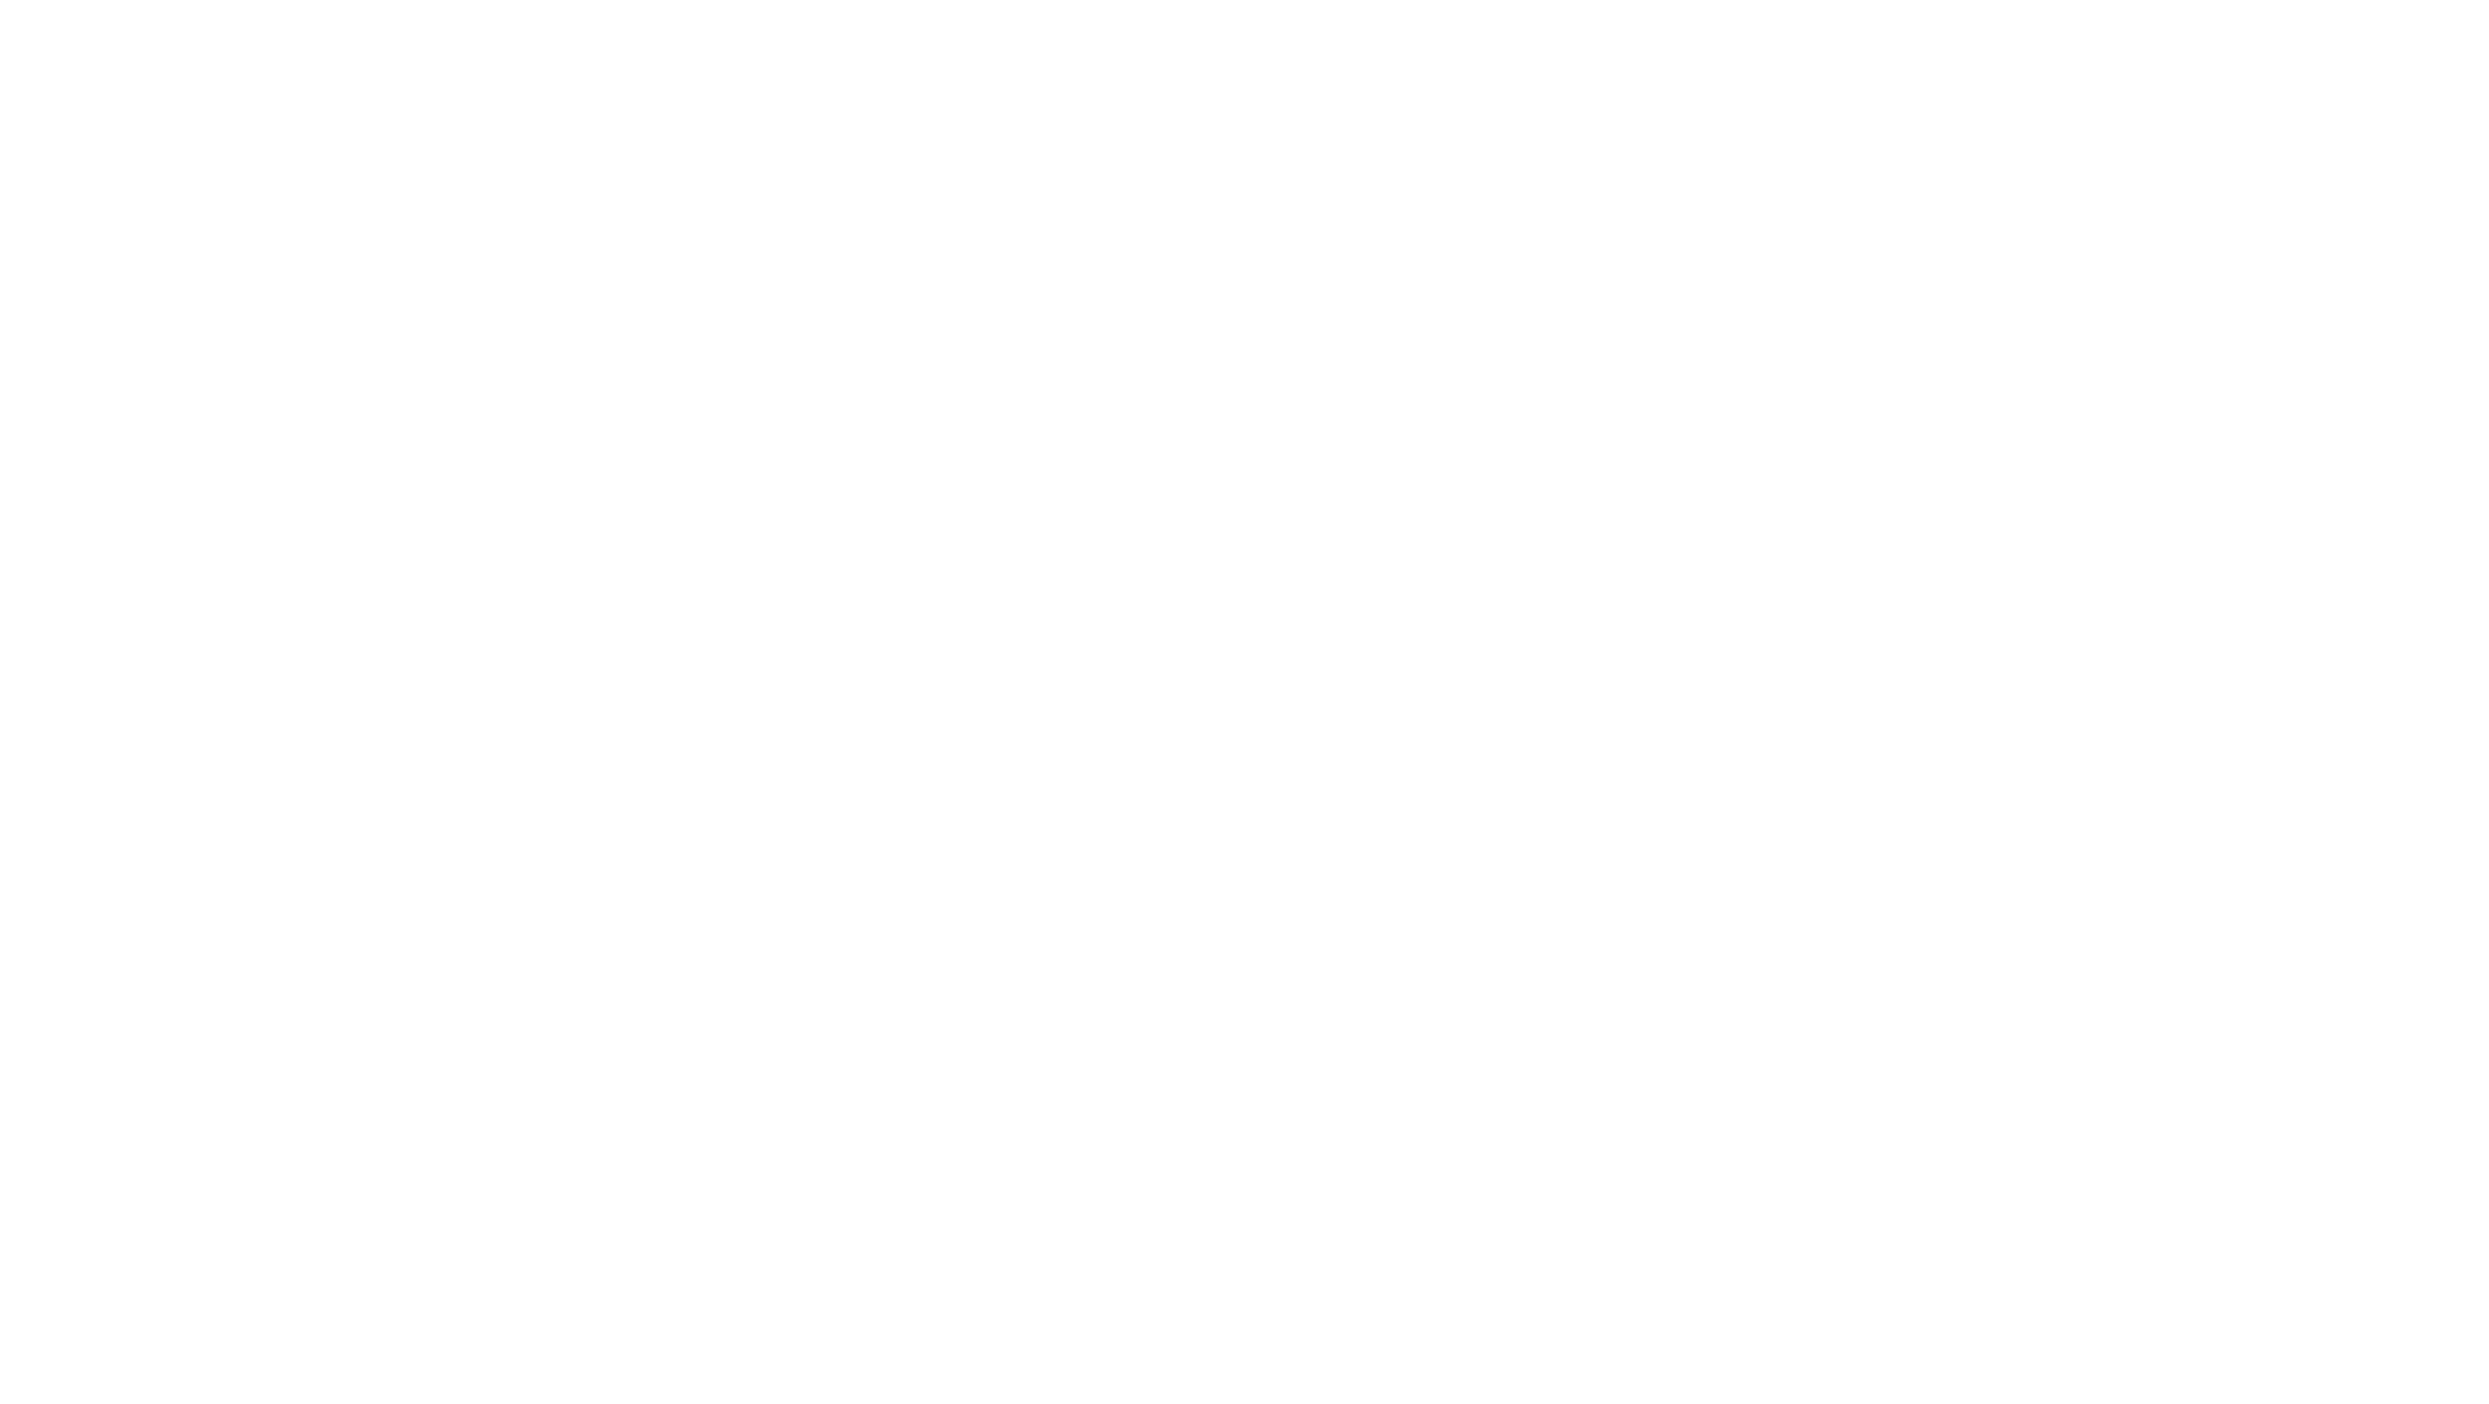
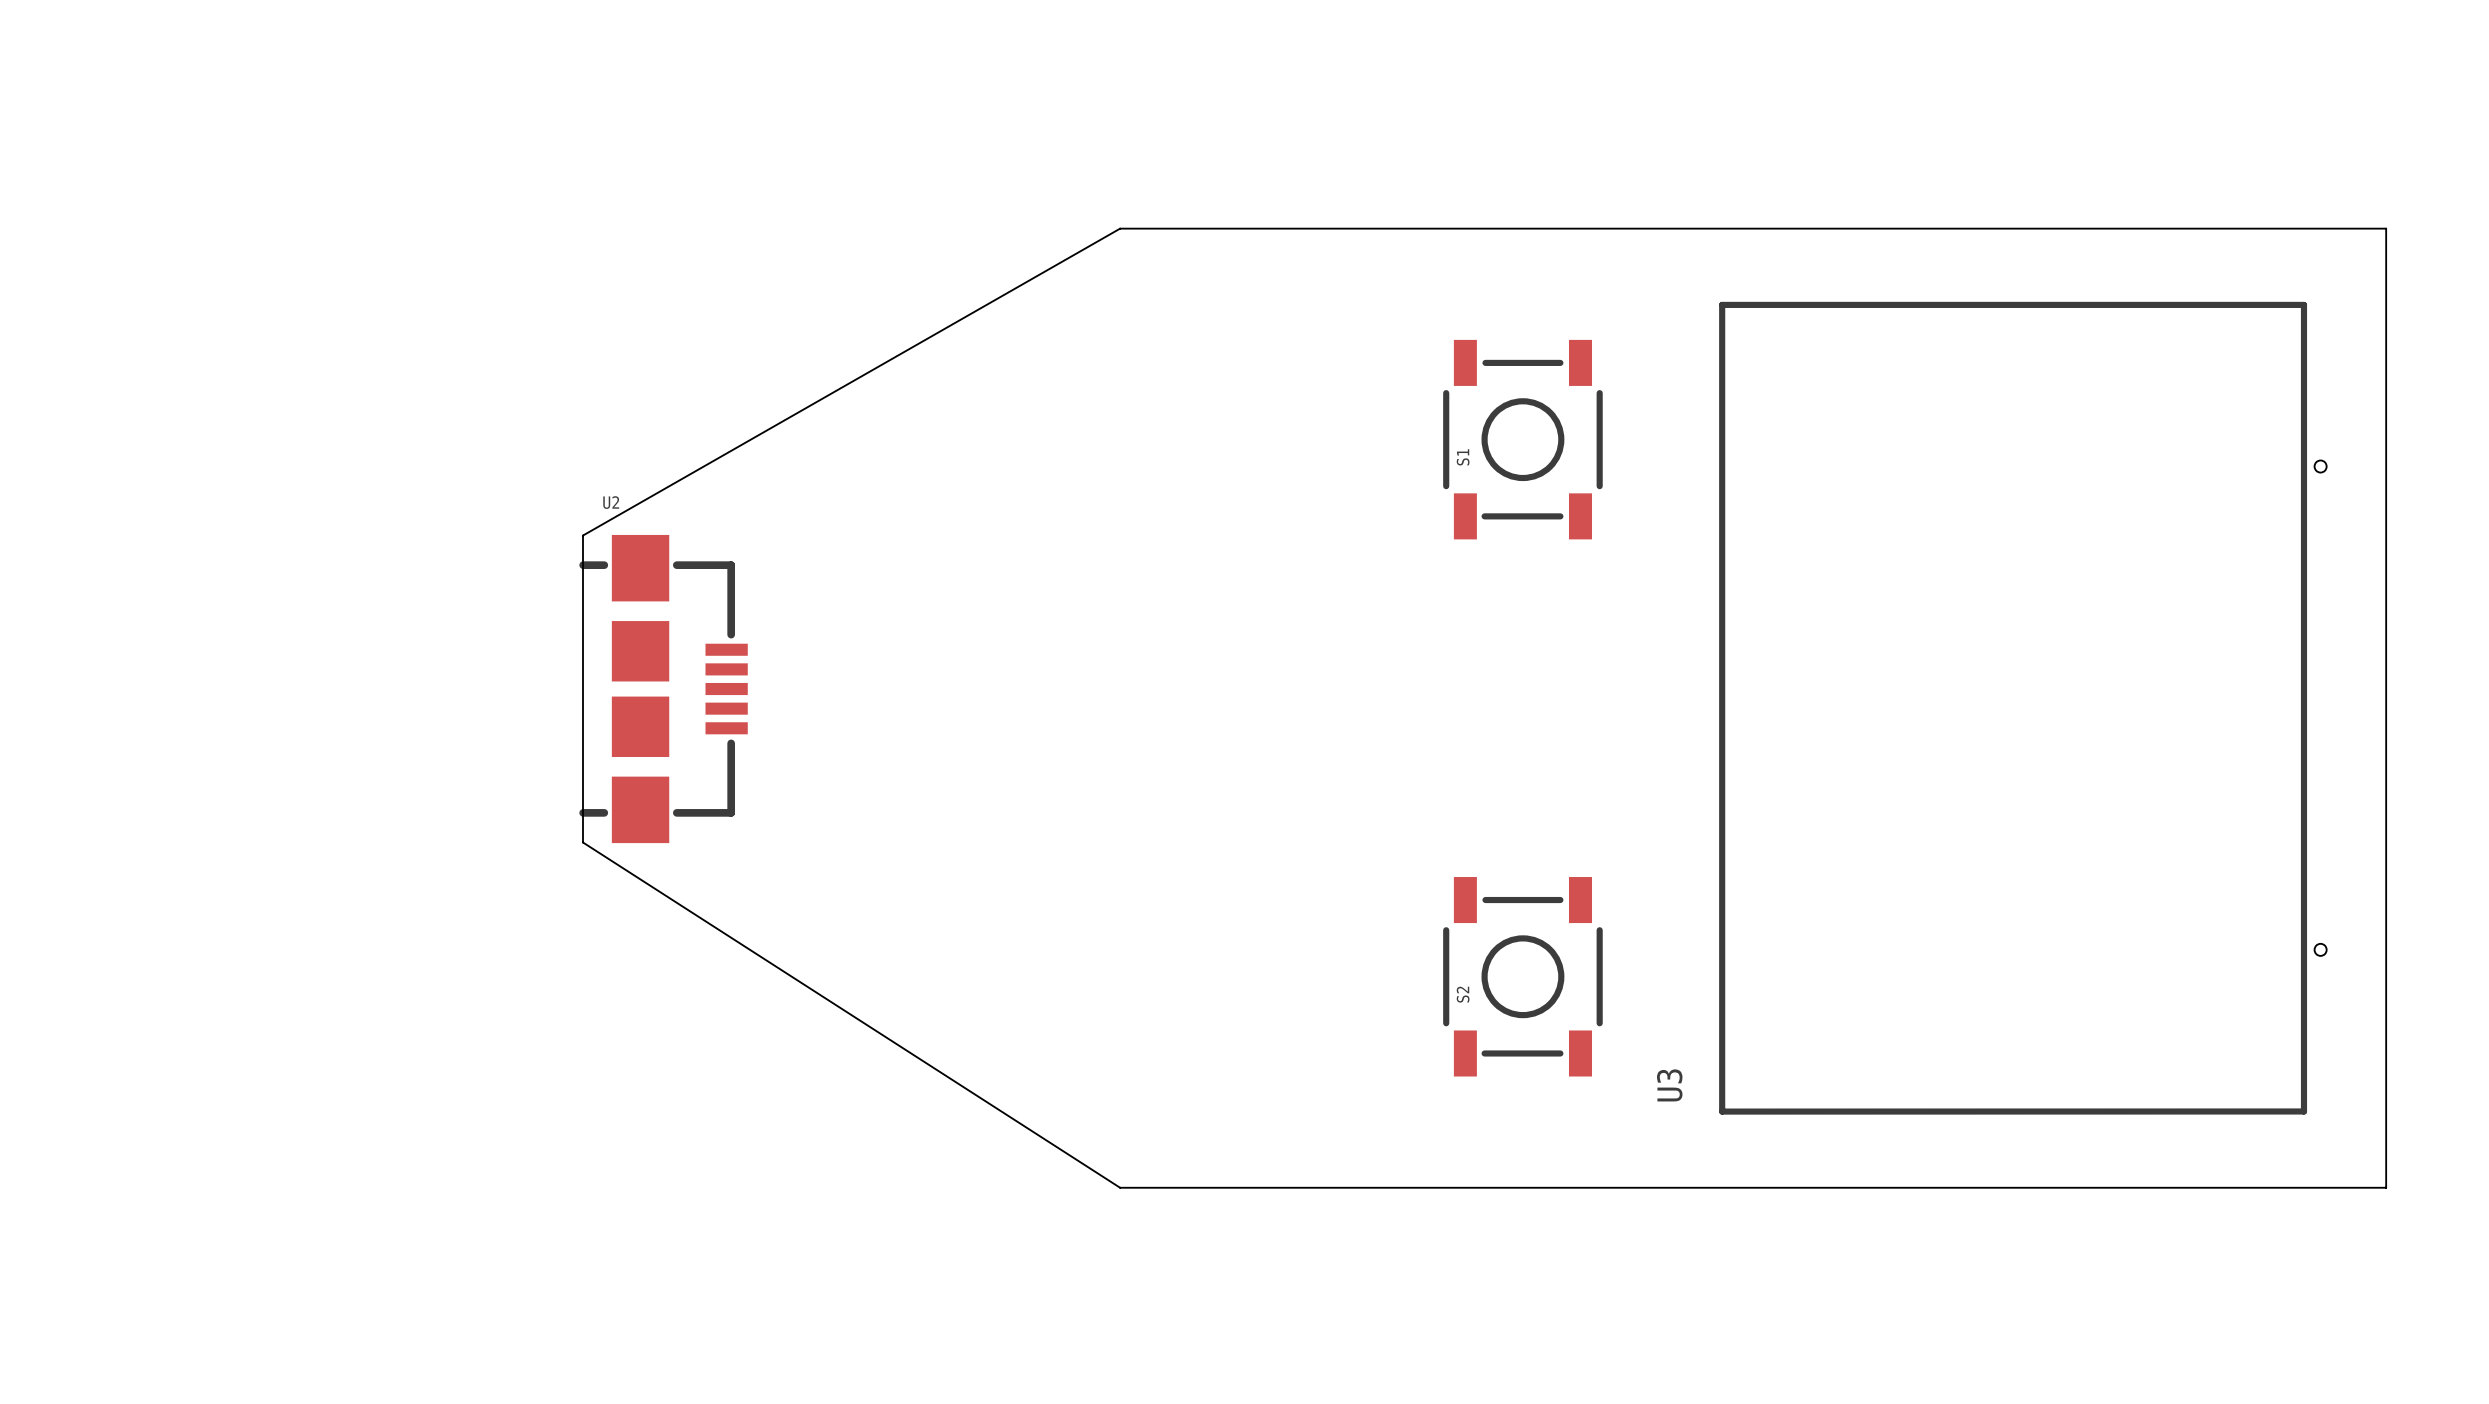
board edge: none -> (1120, 228) (2386, 228) (2386, 1187) (1120, 1187) (583, 842) (583, 535) (1120, 228)
S1: none -> (1522, 439)
U2: none -> (663, 689)
U3: none -> (2022, 708)
S2: none -> (1522, 976)

